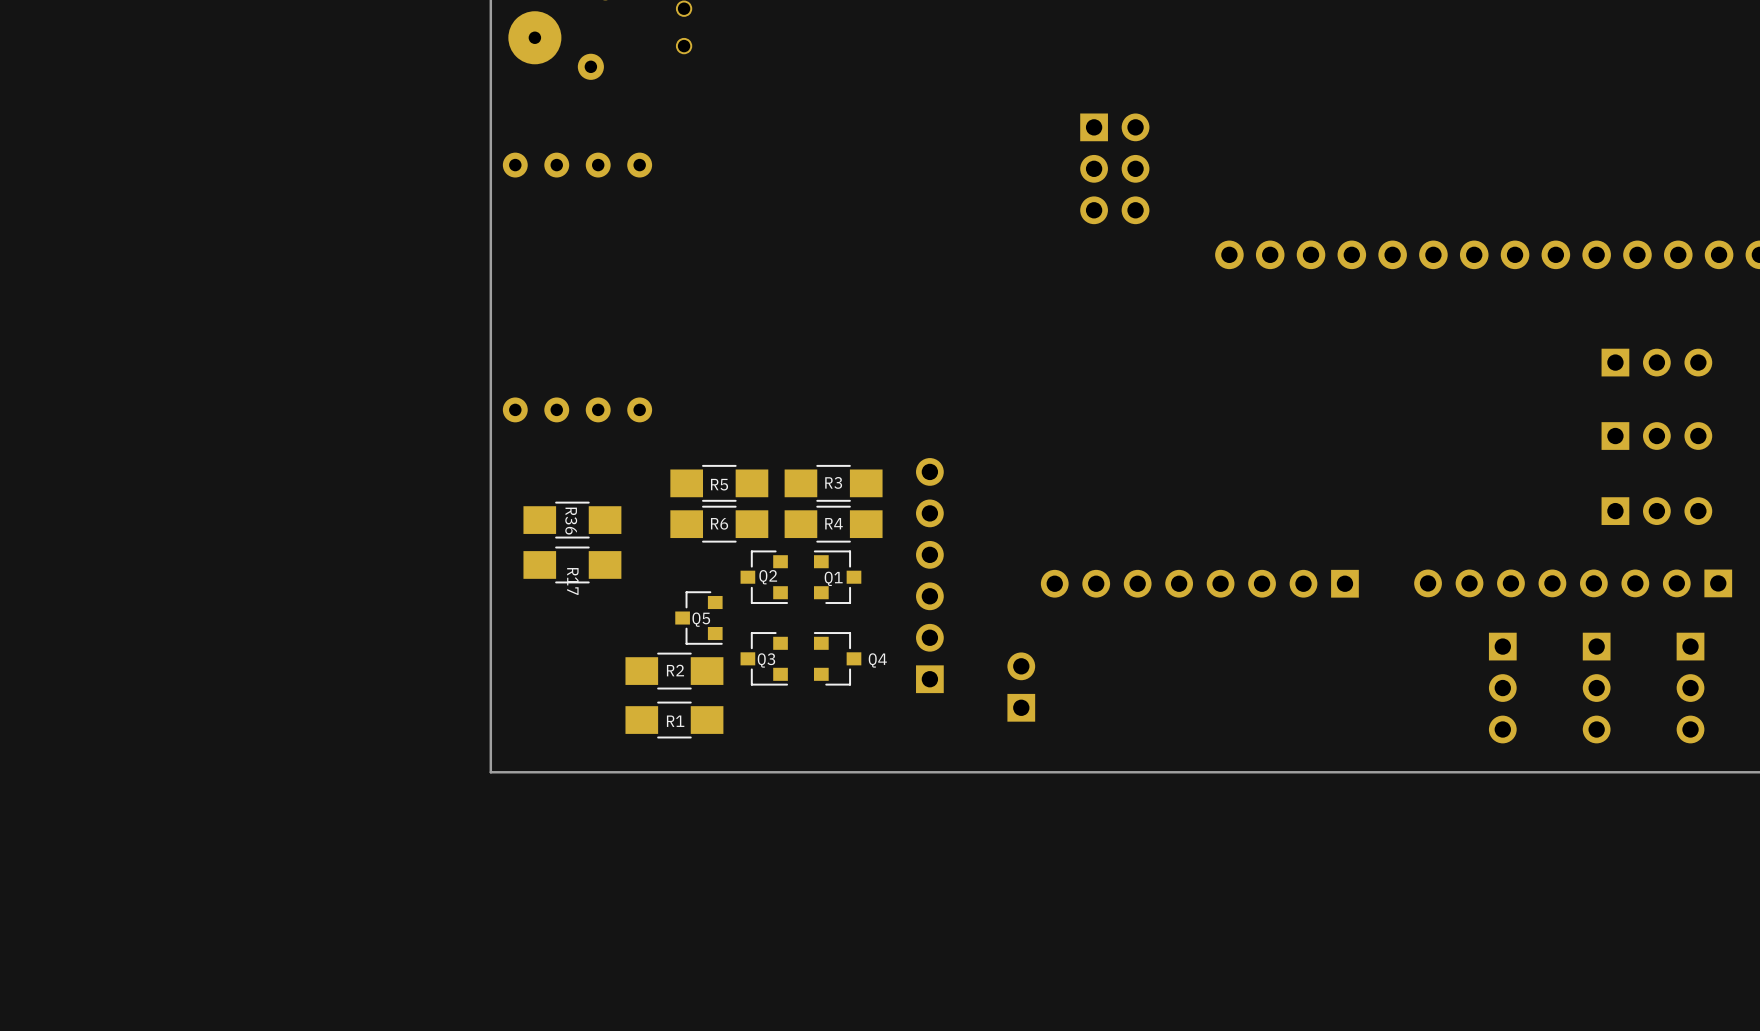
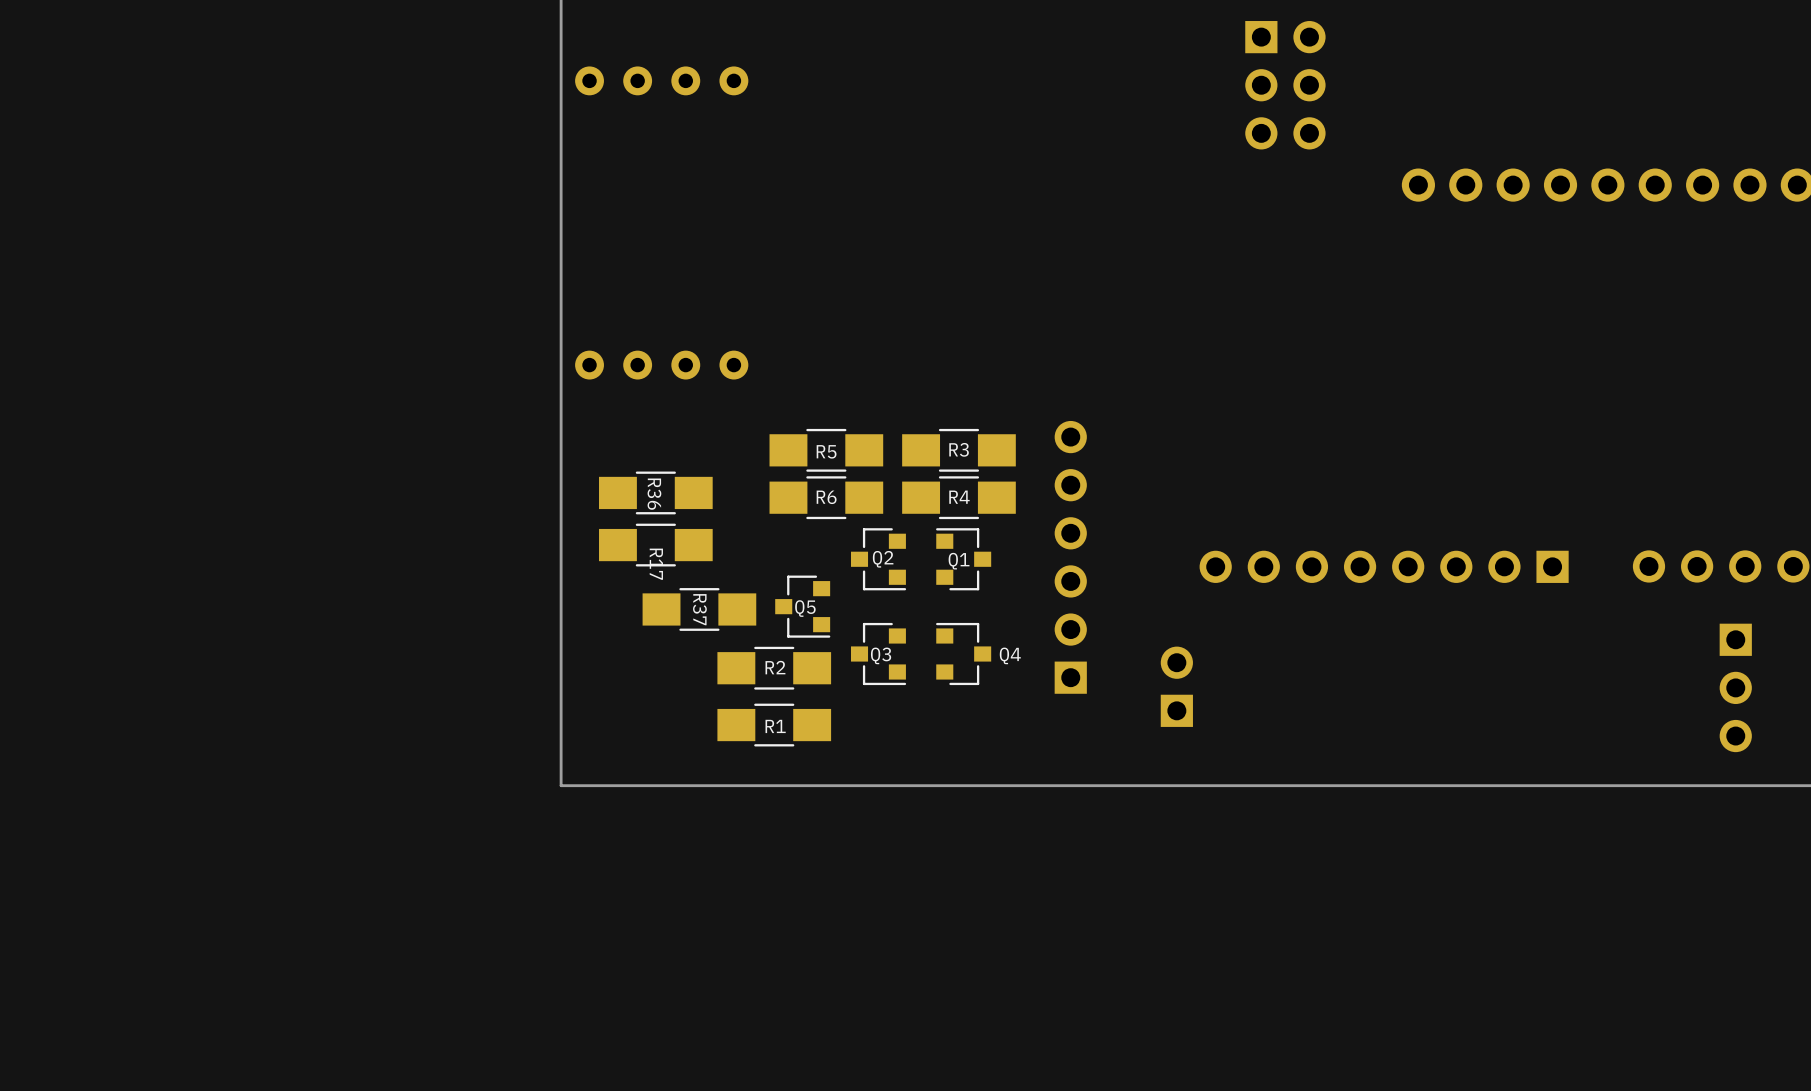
R37: none -> (699, 609)

